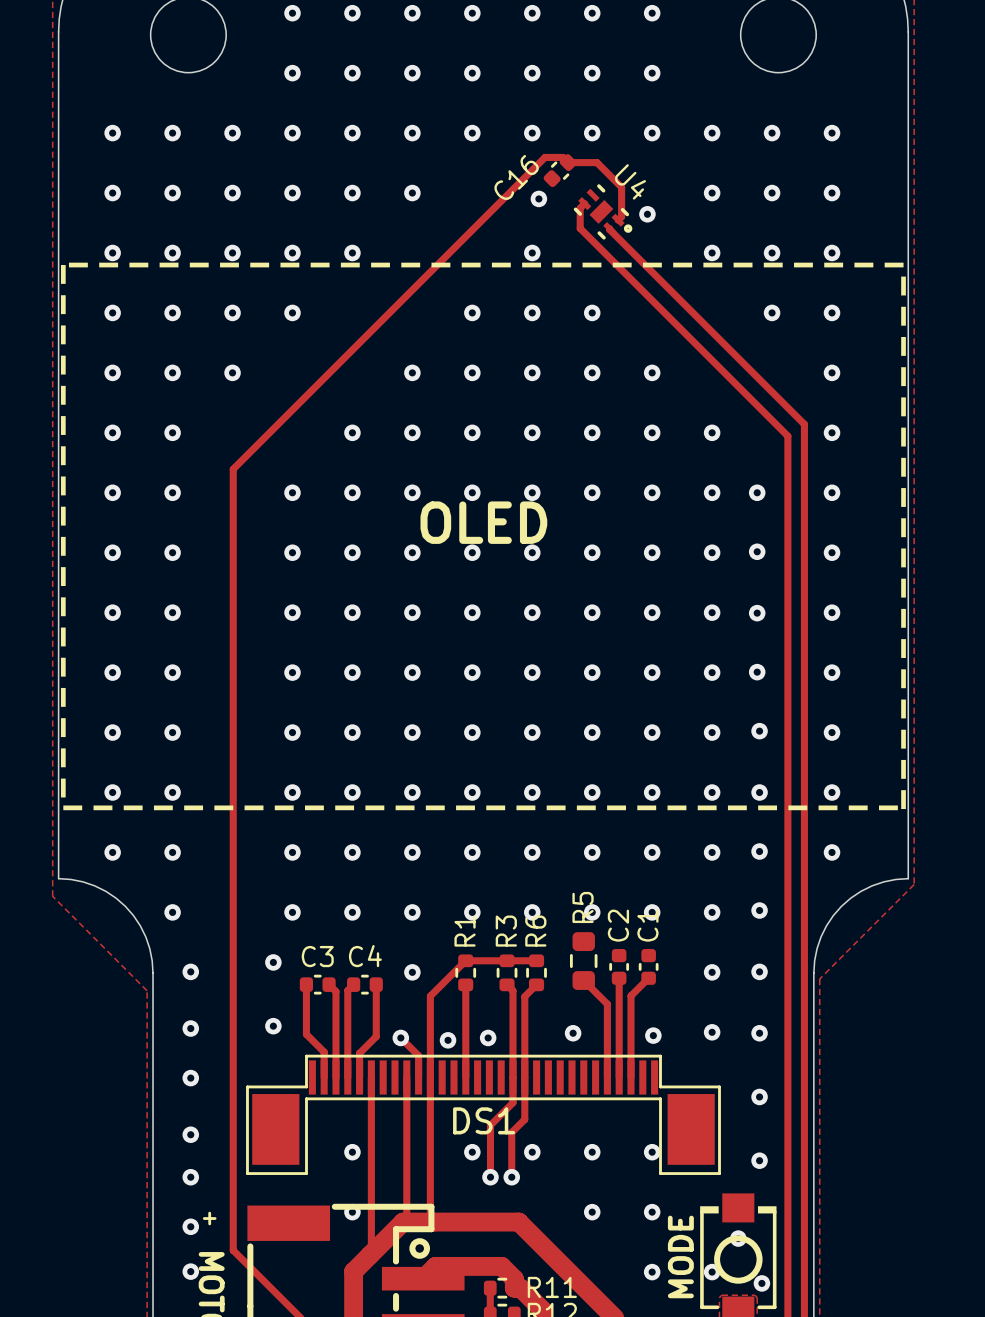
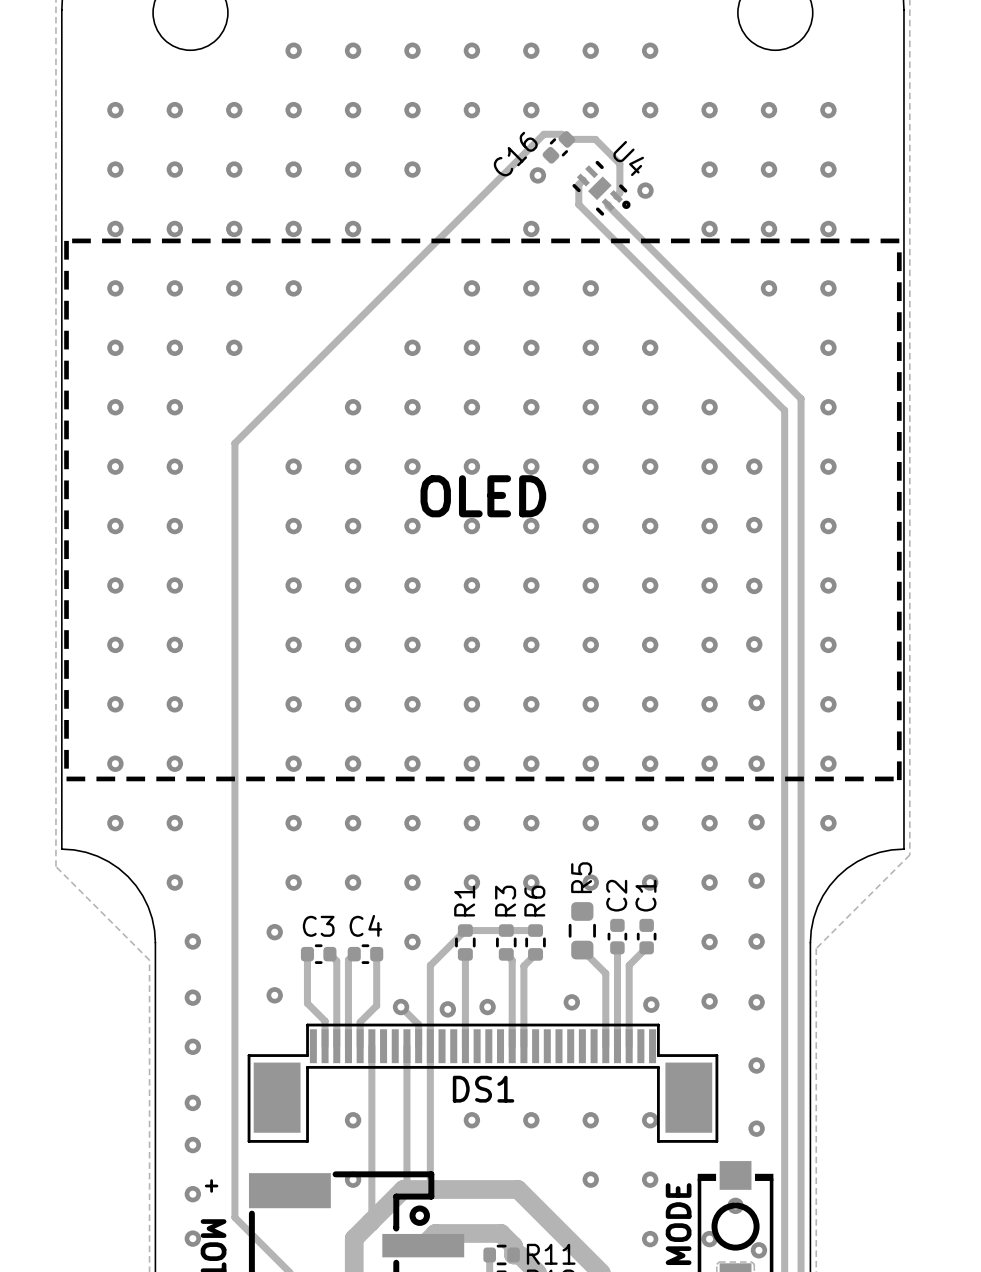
track: (512, 1077) (512, 1102) (490, 1125) (490, 1177) -> none
track: (524, 1077) (524, 1119) (511, 1132) (511, 1177) -> none
via: (490, 1177) -> none
via: (511, 1177) -> none

